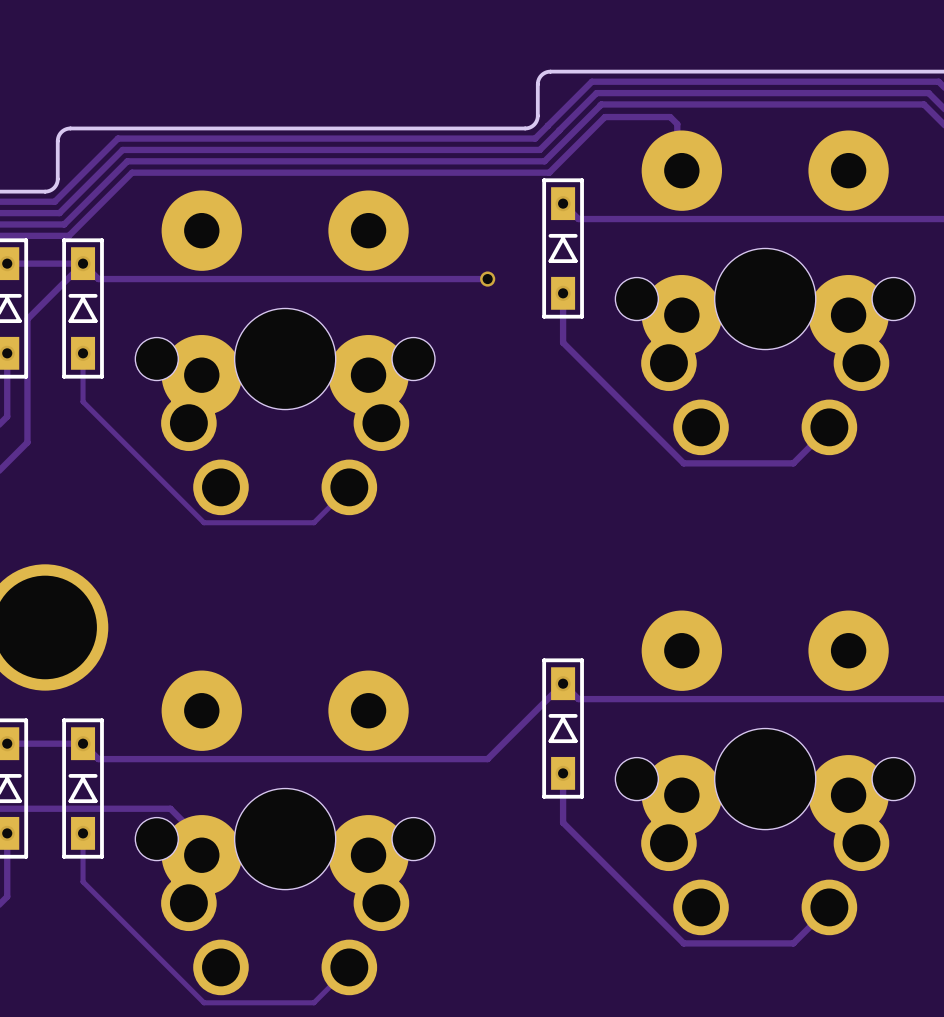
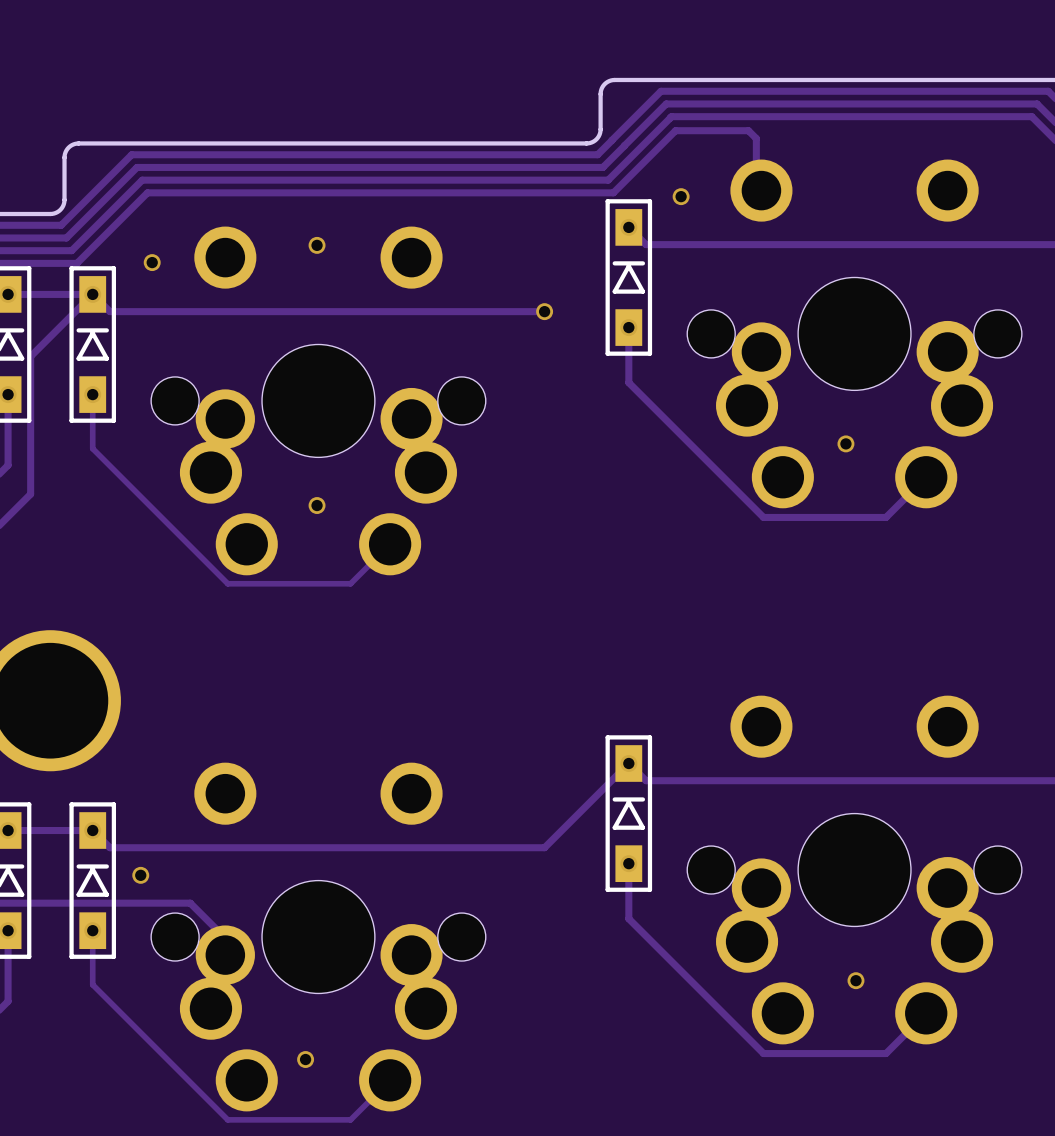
part footprint: [615, 130, 916, 456] -> [687, 159, 1022, 509]
via: none -> (681, 196)
part footprint: [135, 190, 435, 516] -> [151, 226, 486, 576]
via: none -> (317, 245)
via: none -> (152, 262)
via: none -> (845, 443)
via: none -> (317, 505)
part footprint: [615, 610, 916, 936] -> [687, 695, 1022, 1045]
part footprint: [135, 670, 435, 996] -> [151, 762, 486, 1112]
via: none -> (140, 875)
via: none -> (855, 980)
via: none -> (305, 1059)

